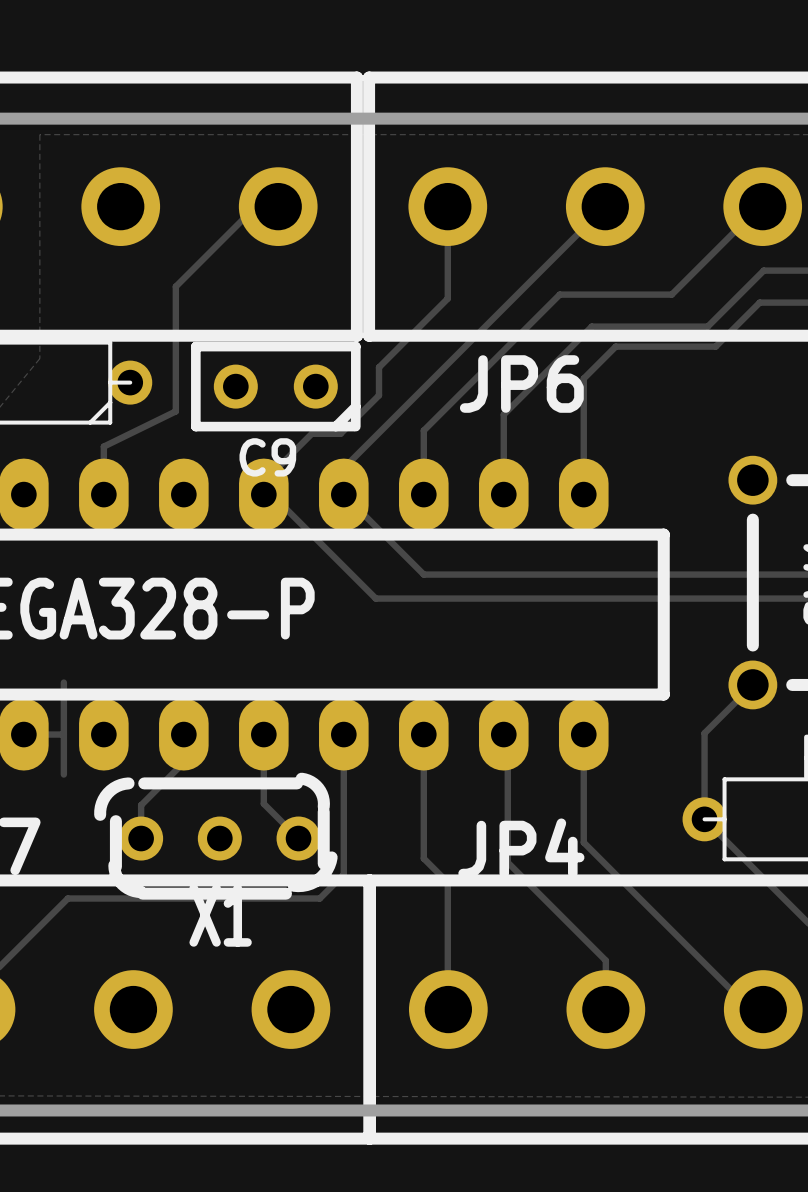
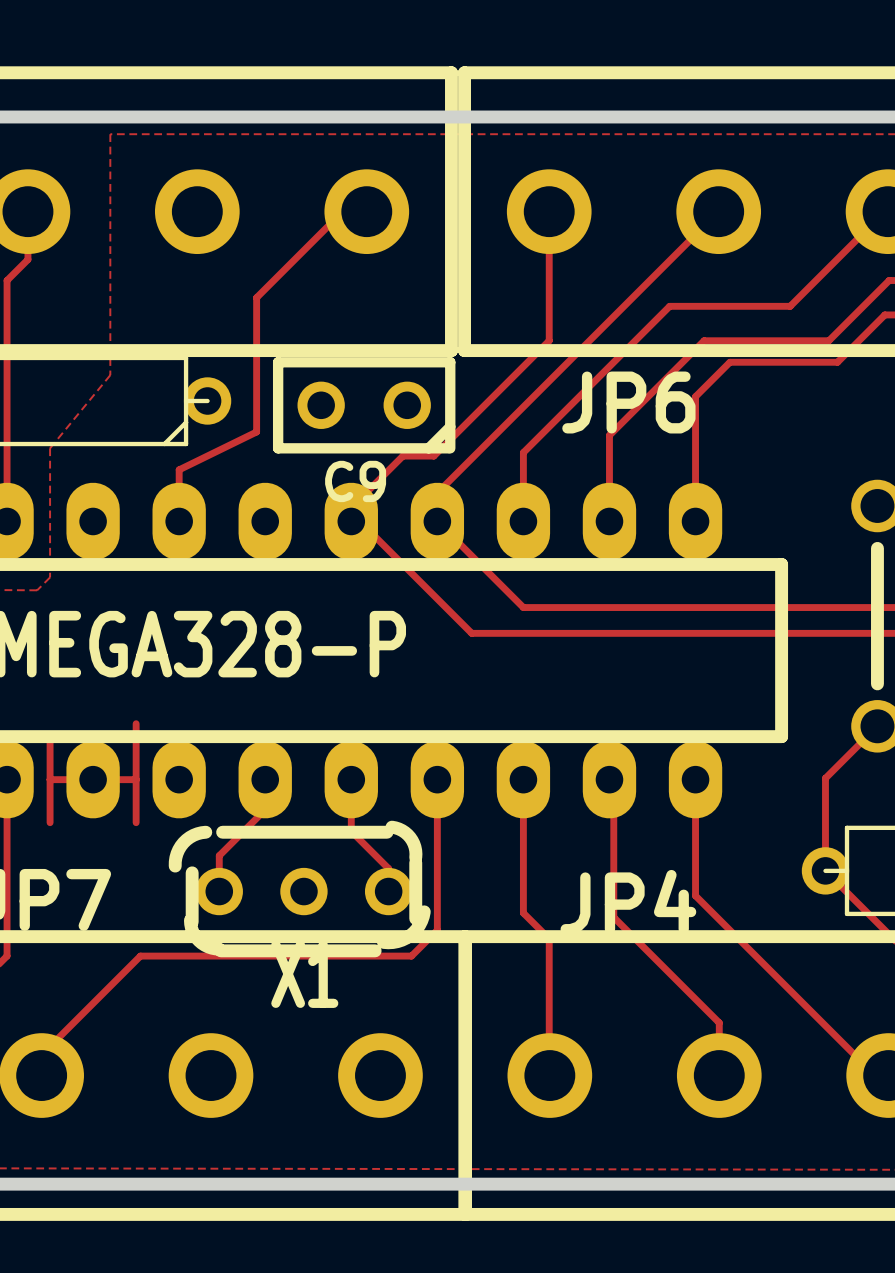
track: (447, 298) (379, 367) (379, 395) -> (549, 310) (549, 340) (475, 414)
track: (263, 782) (263, 803) (298, 838) -> (351, 831) (388, 868) (388, 887)

